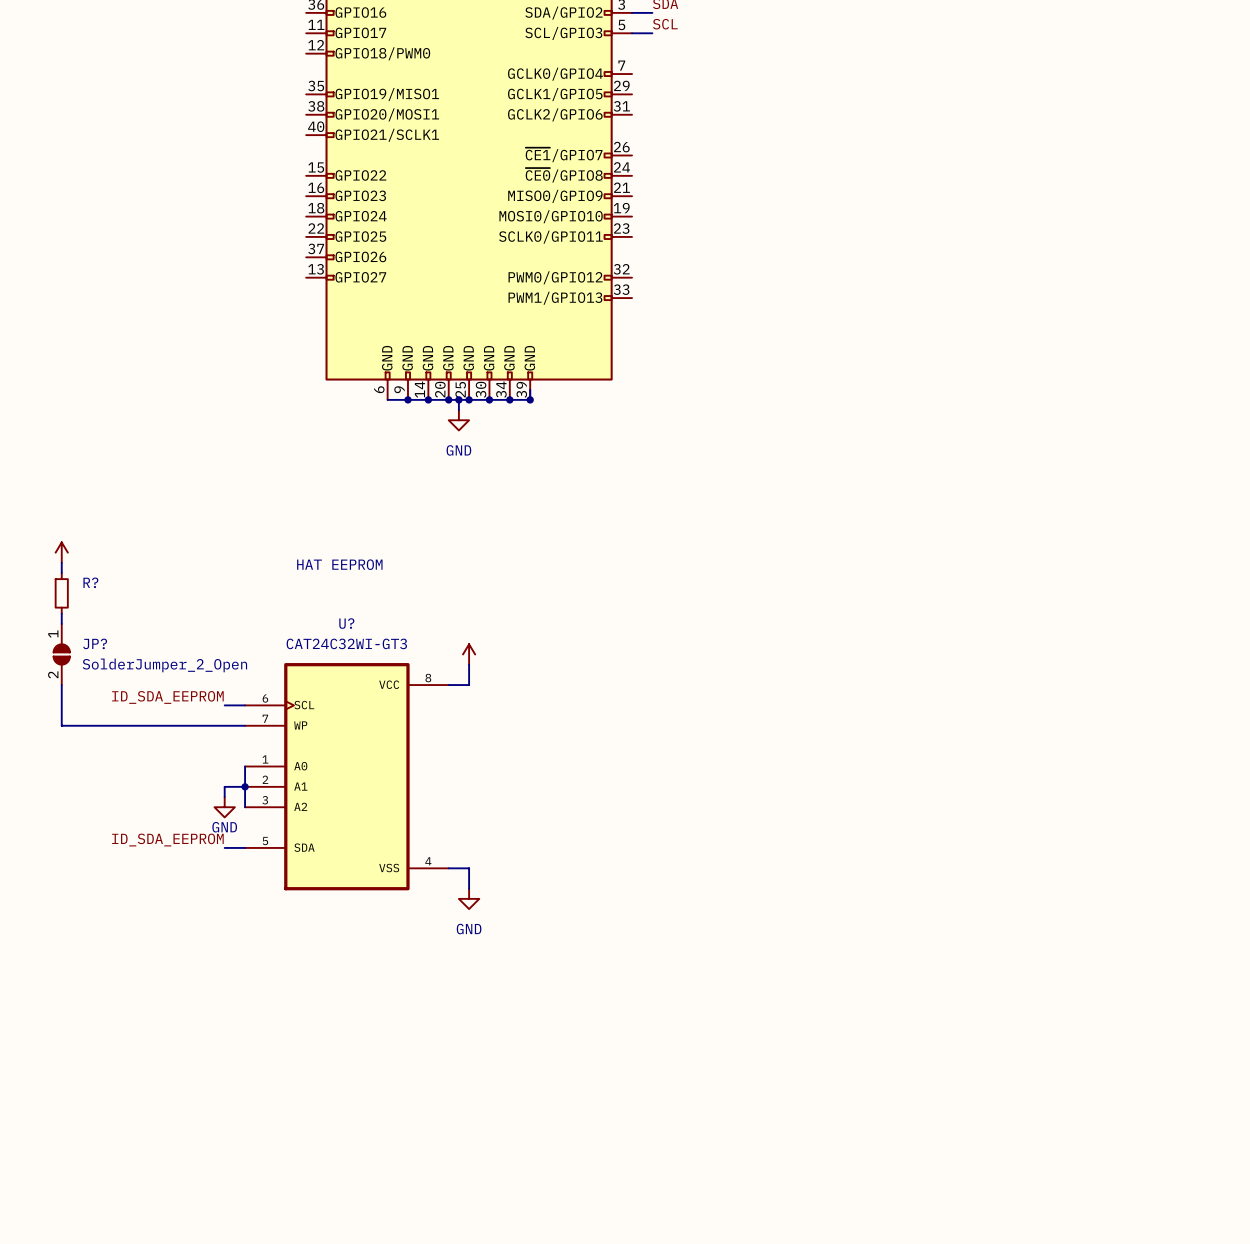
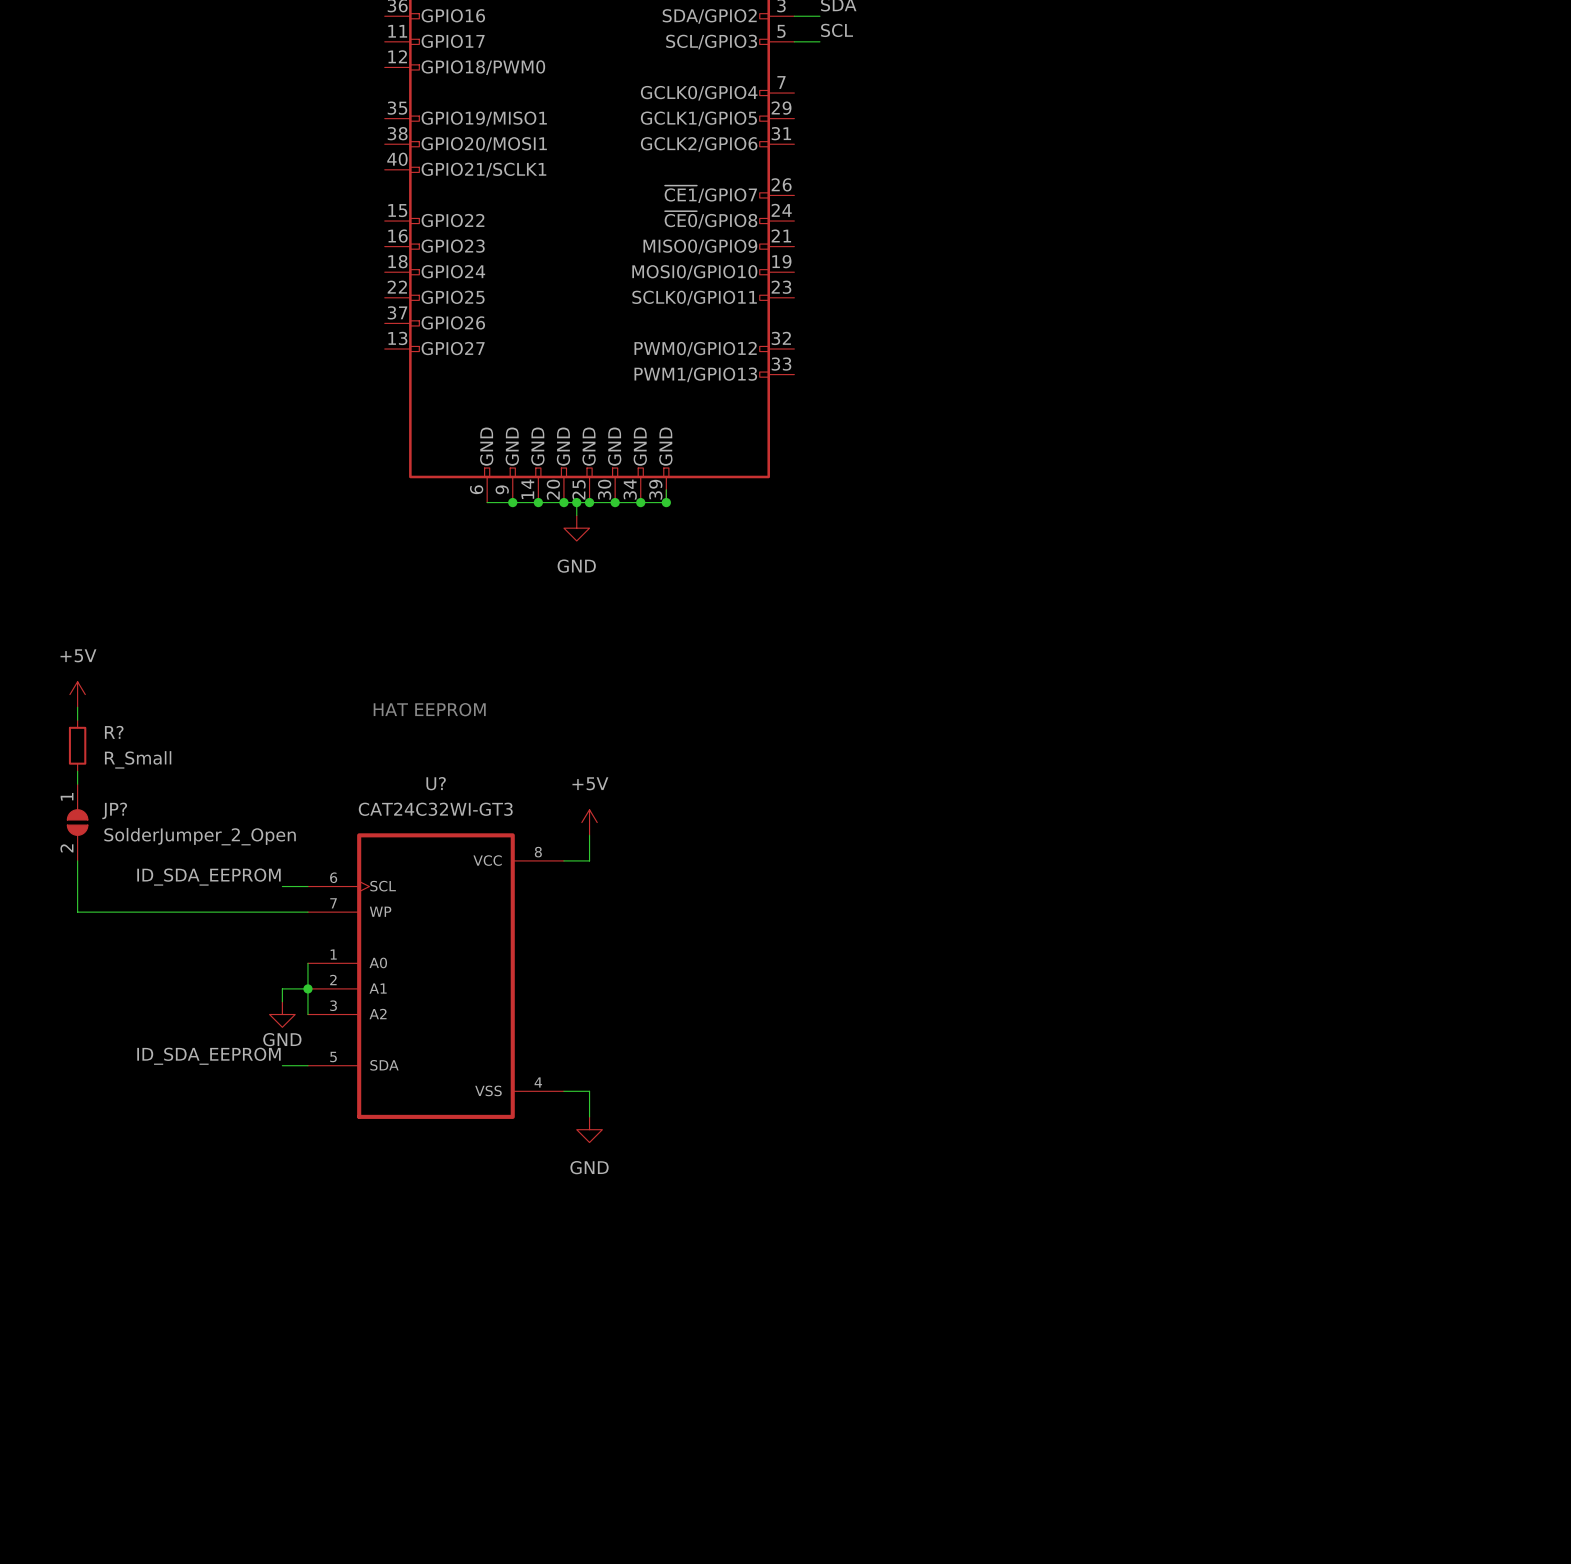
power symbol text: none -> +5V (78, 655)
R? value: none -> R_Small (138, 759)
power symbol text: none -> +5V (590, 783)

